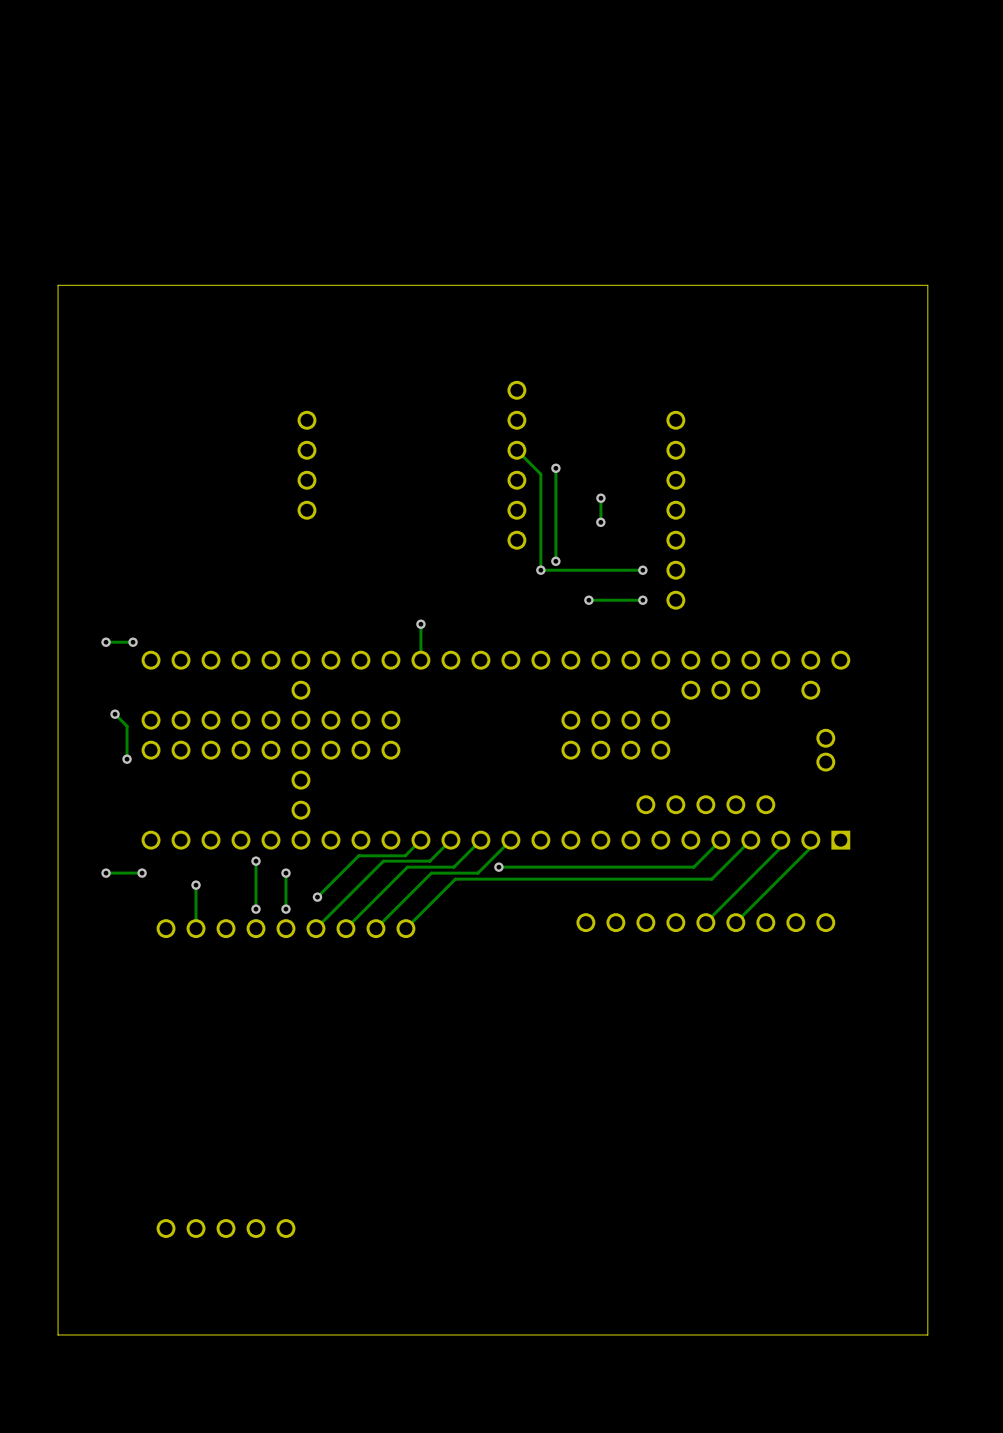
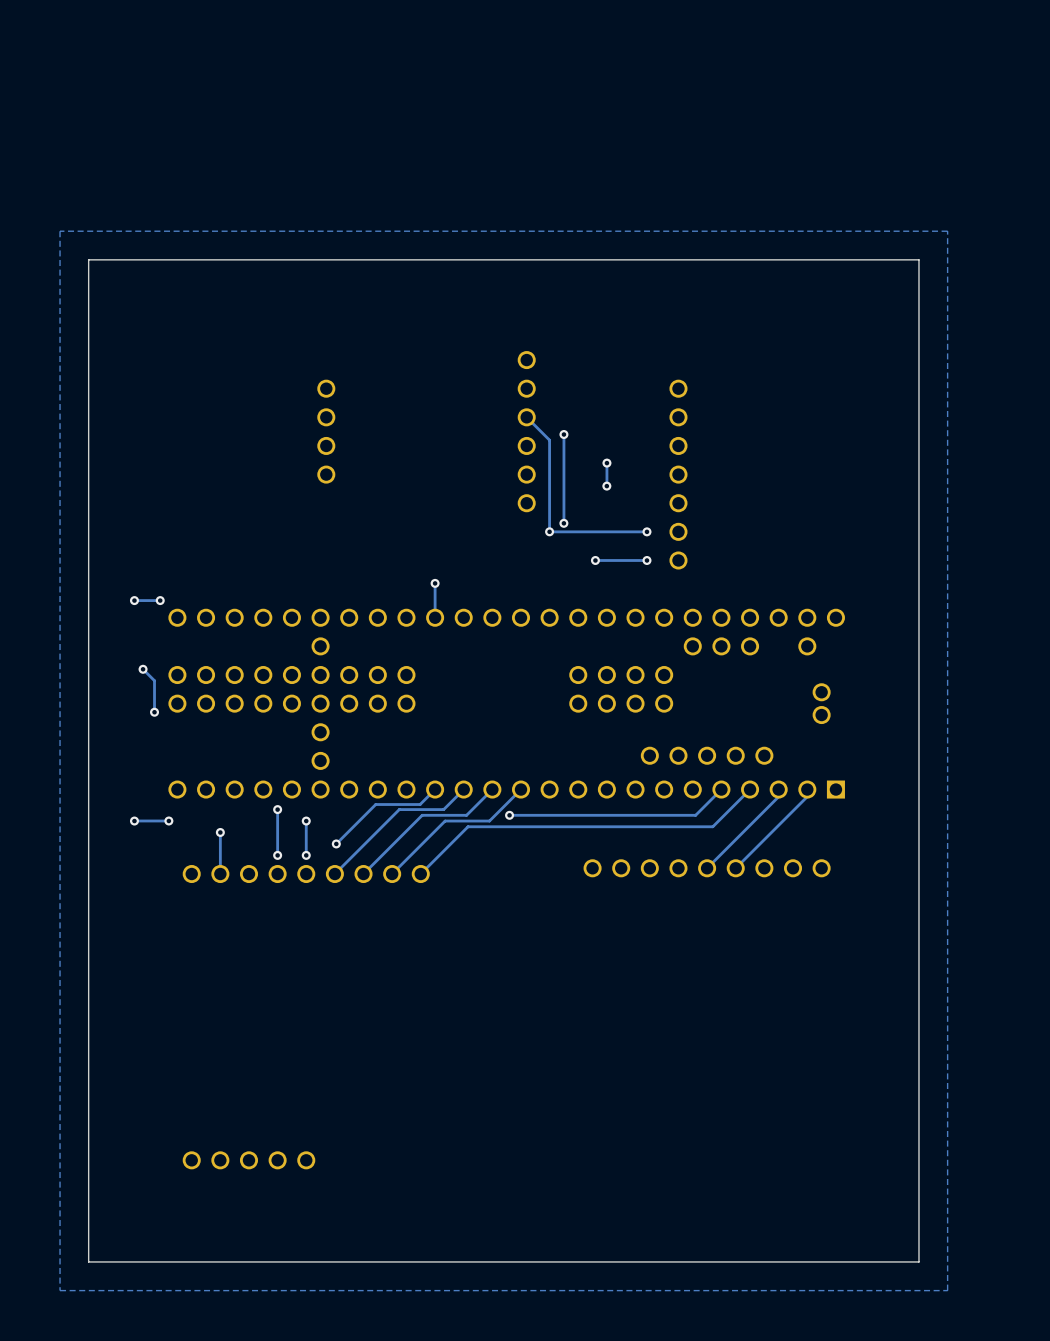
zone outline: none -> (947, 231) (947, 1290) (60, 1290) (60, 231) (947, 231)

